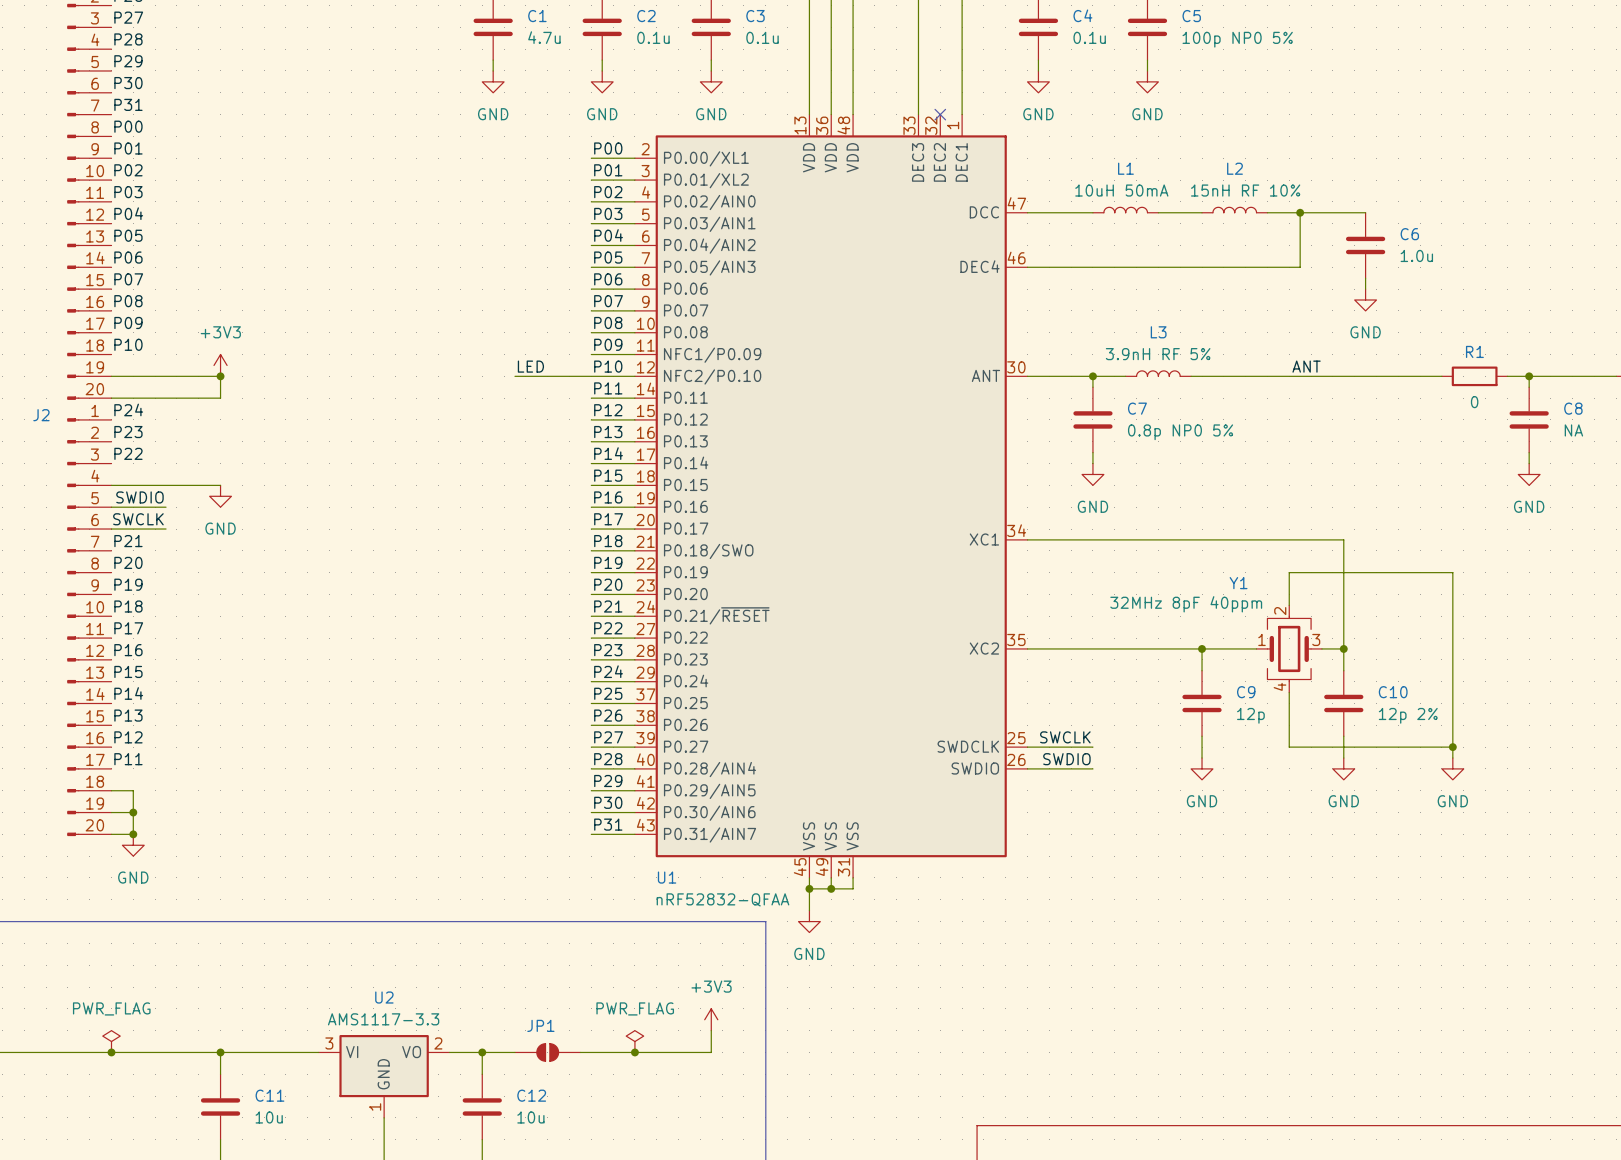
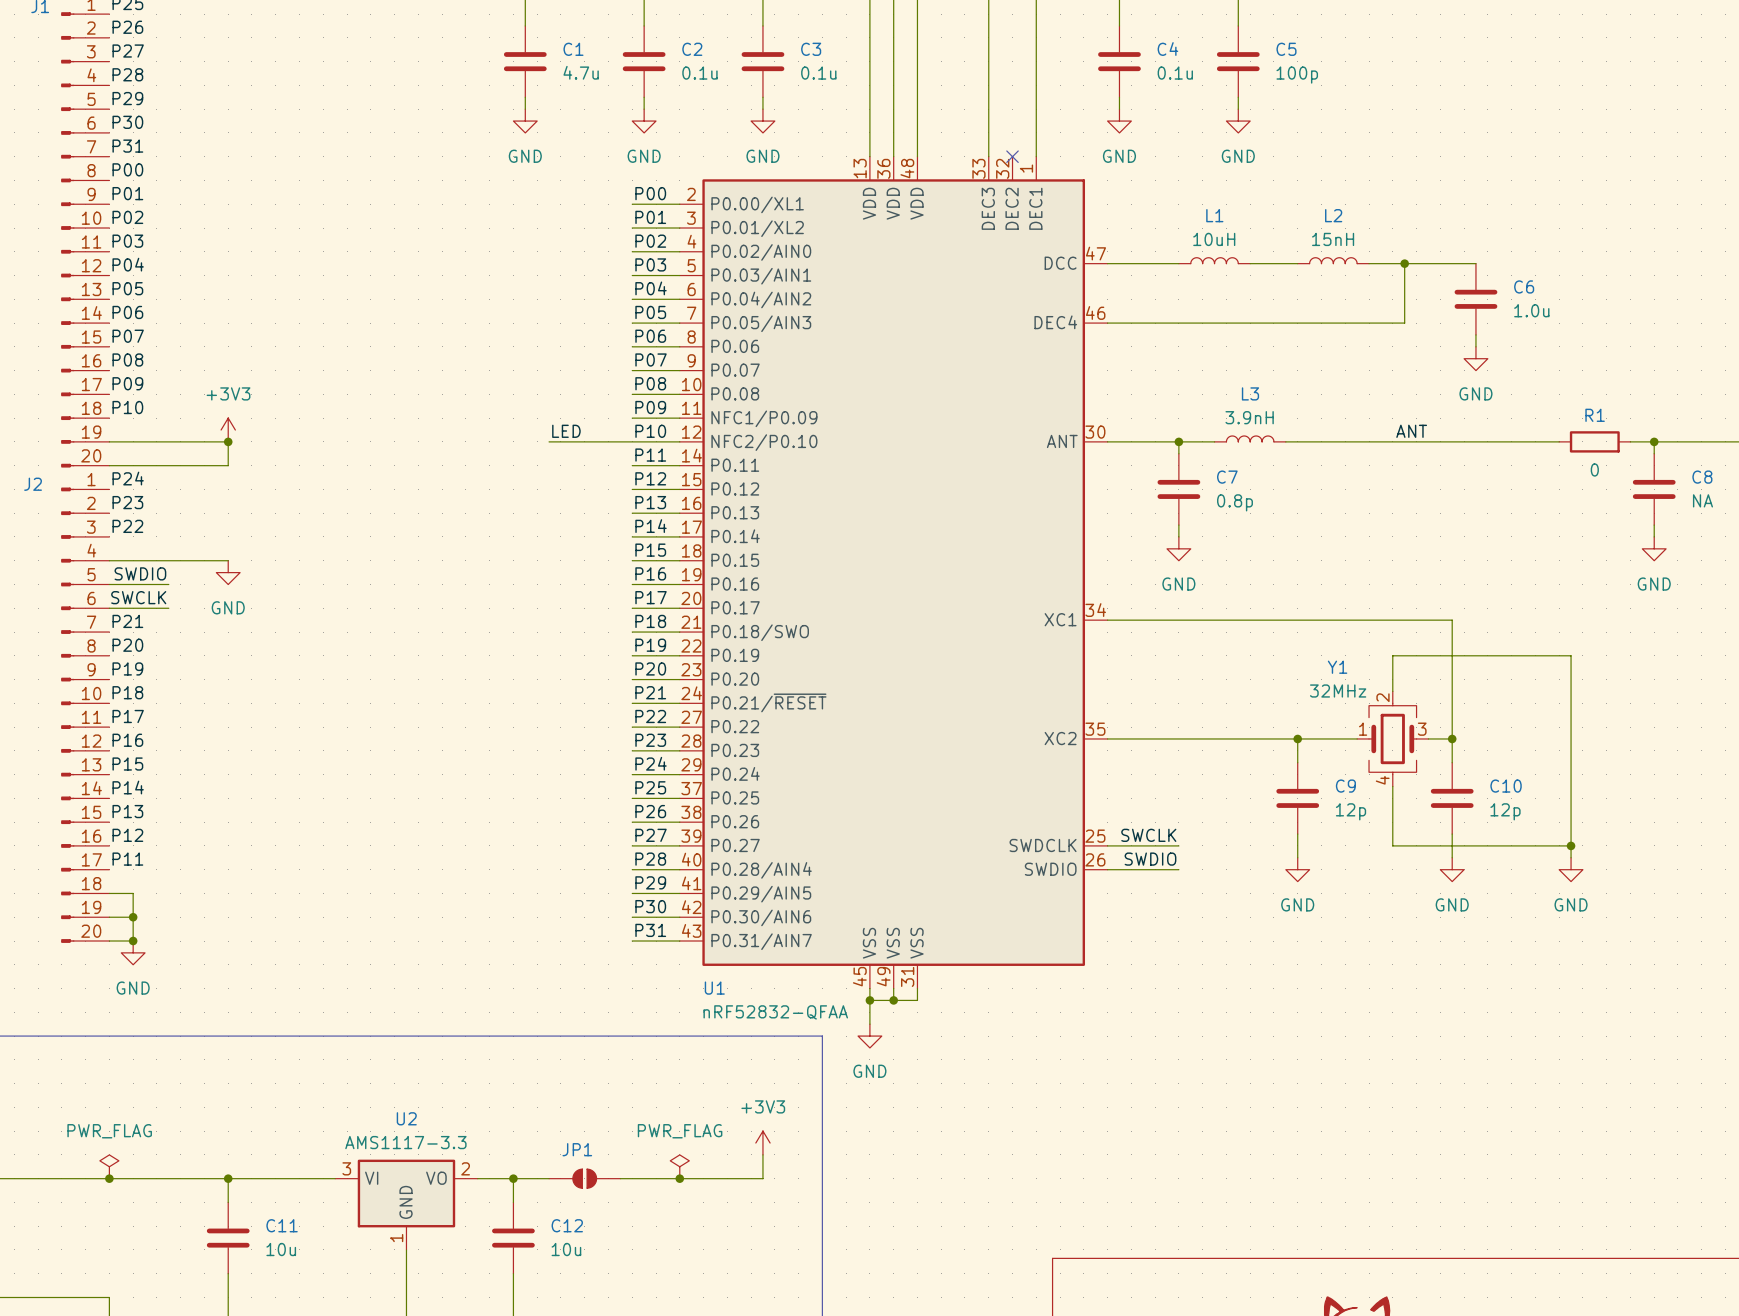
C5 value: 100p NP0 5% (1237, 39) -> 100p (1297, 75)
L1 value: 10uH 50mA (1121, 190) -> 10uH (1214, 239)
L2 value: 15nH RF 10% (1245, 190) -> 15nH (1333, 239)
L3 value: 3.9nH RF 5% (1158, 354) -> 3.9nH (1249, 417)
C7 value: 0.8p NP0 5% (1180, 432) -> 0.8p (1235, 502)
Y1 value: 32MHz 8pF 40ppm (1186, 604) -> 32MHz (1338, 691)
C10 value: 12p 2% (1408, 715) -> 12p (1505, 811)

